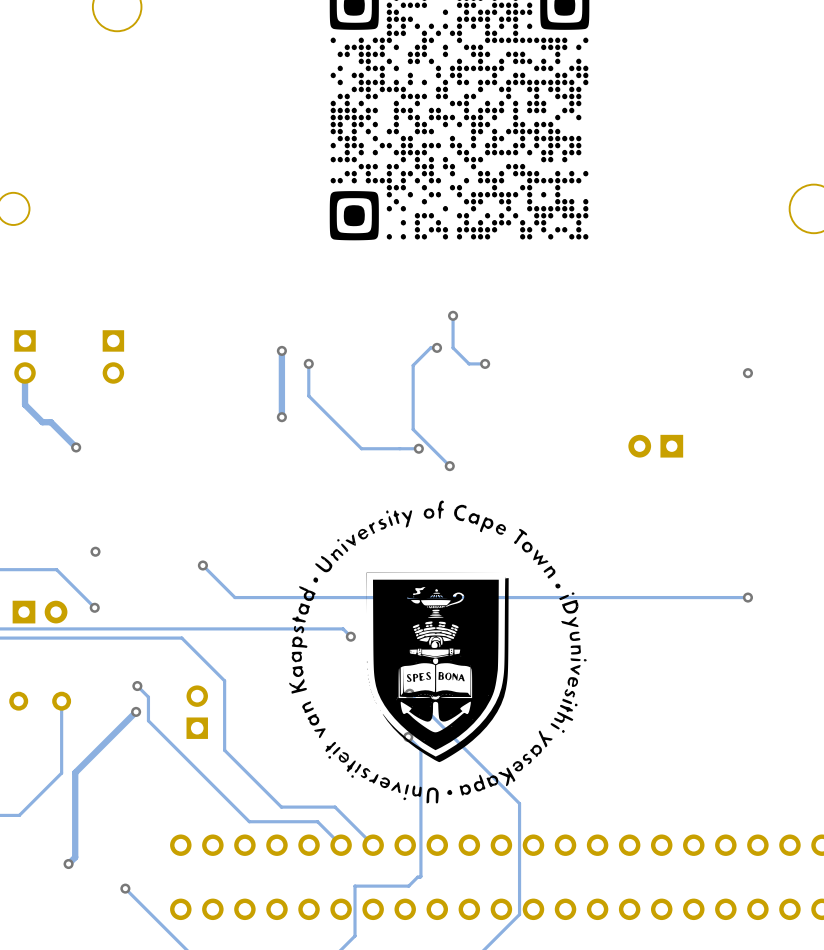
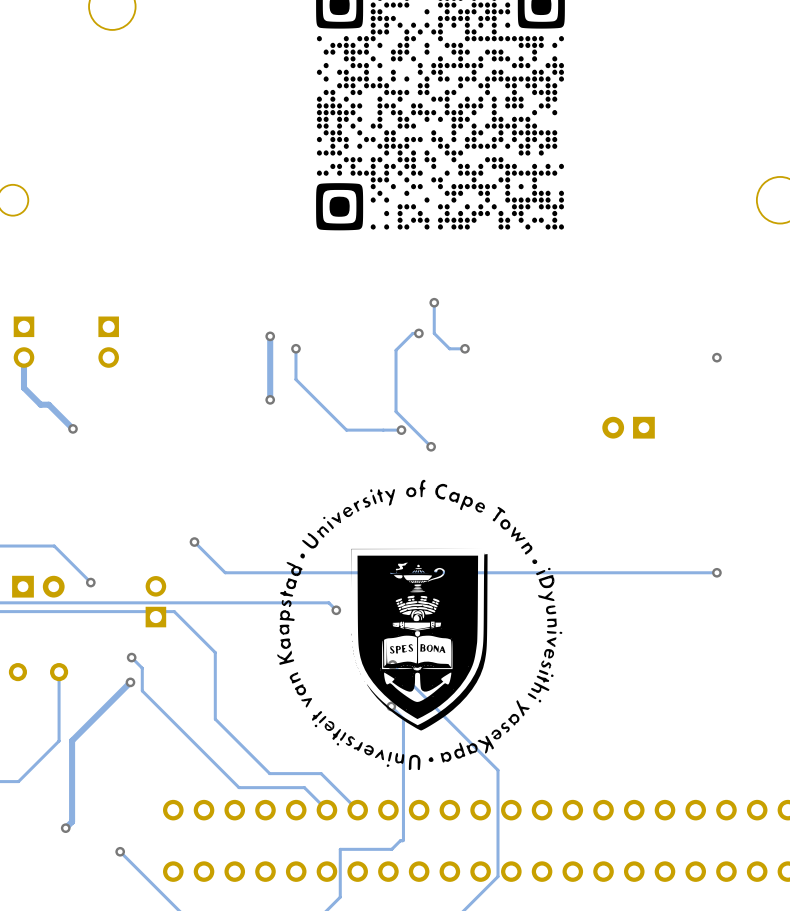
via: (95, 551) -> none
part position: (197, 712) -> (155, 601)

